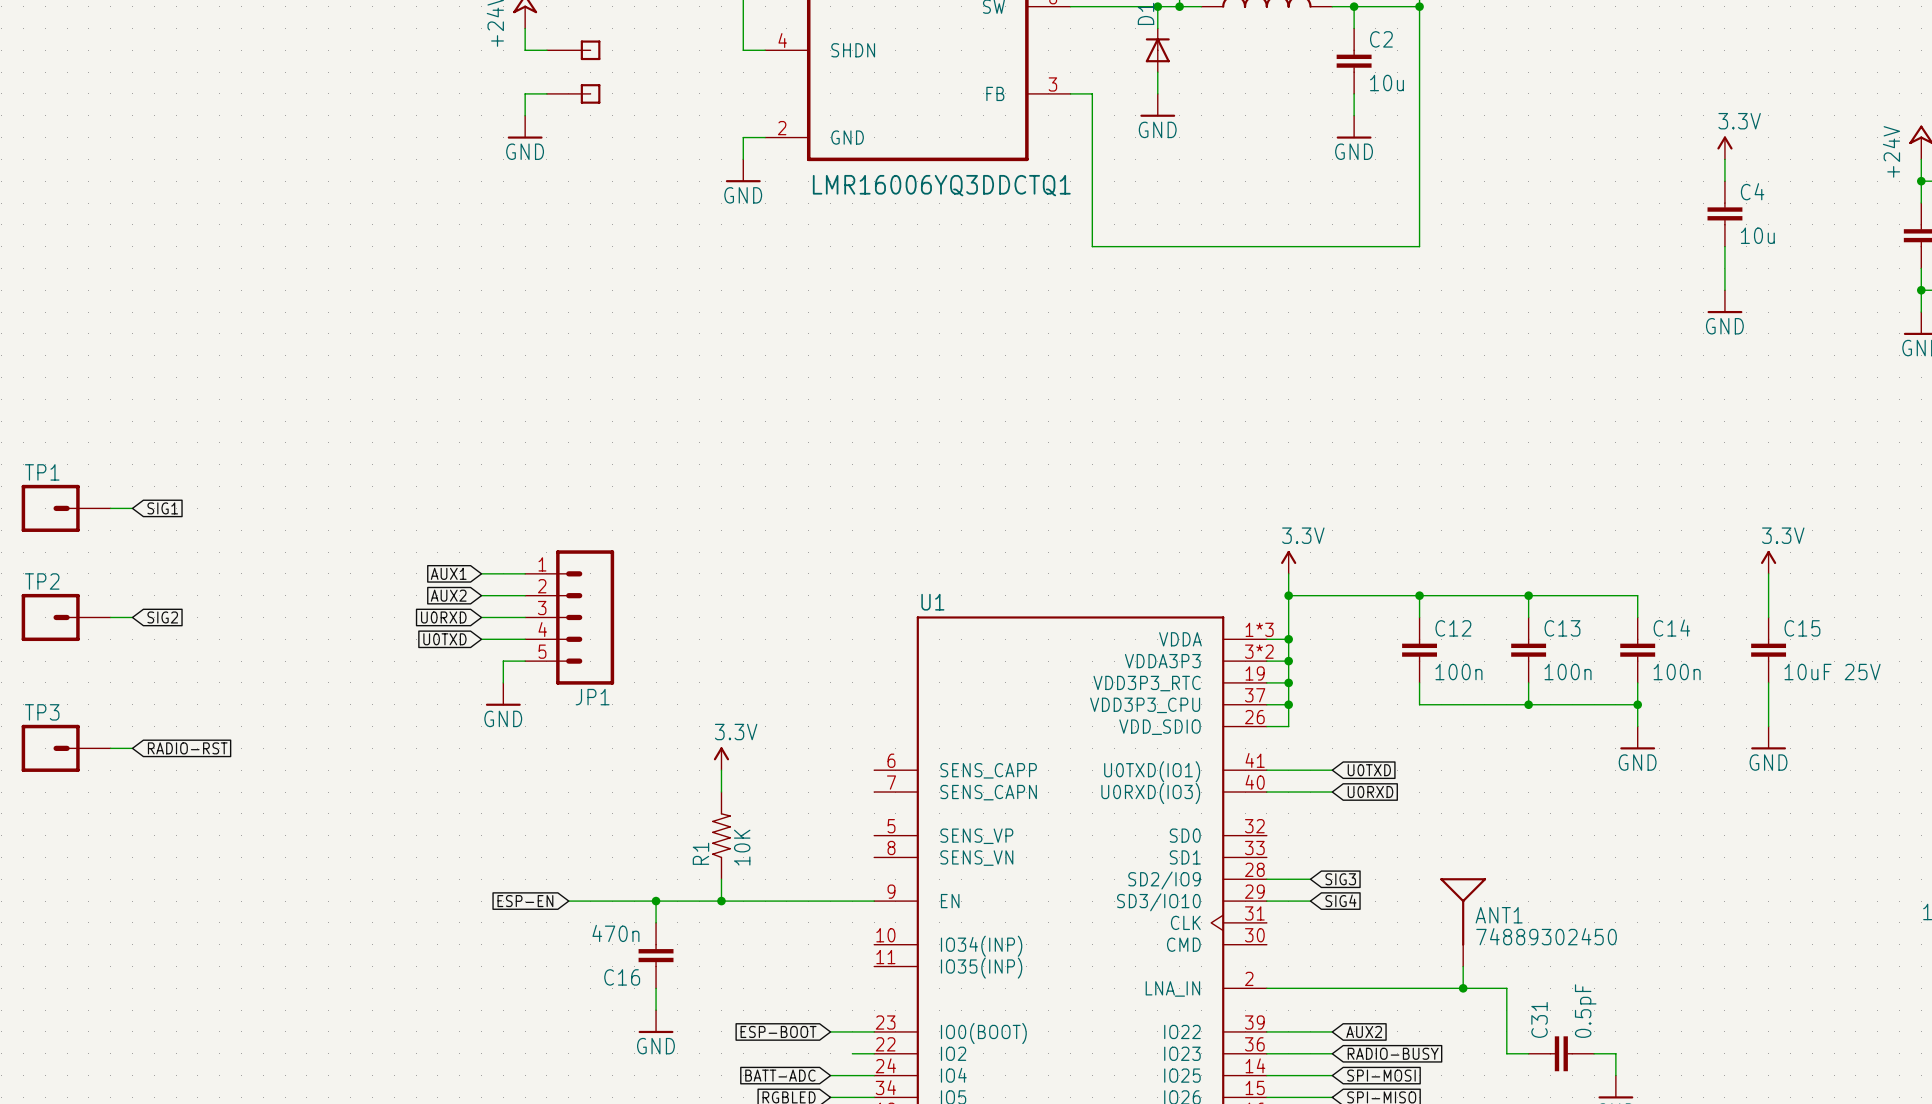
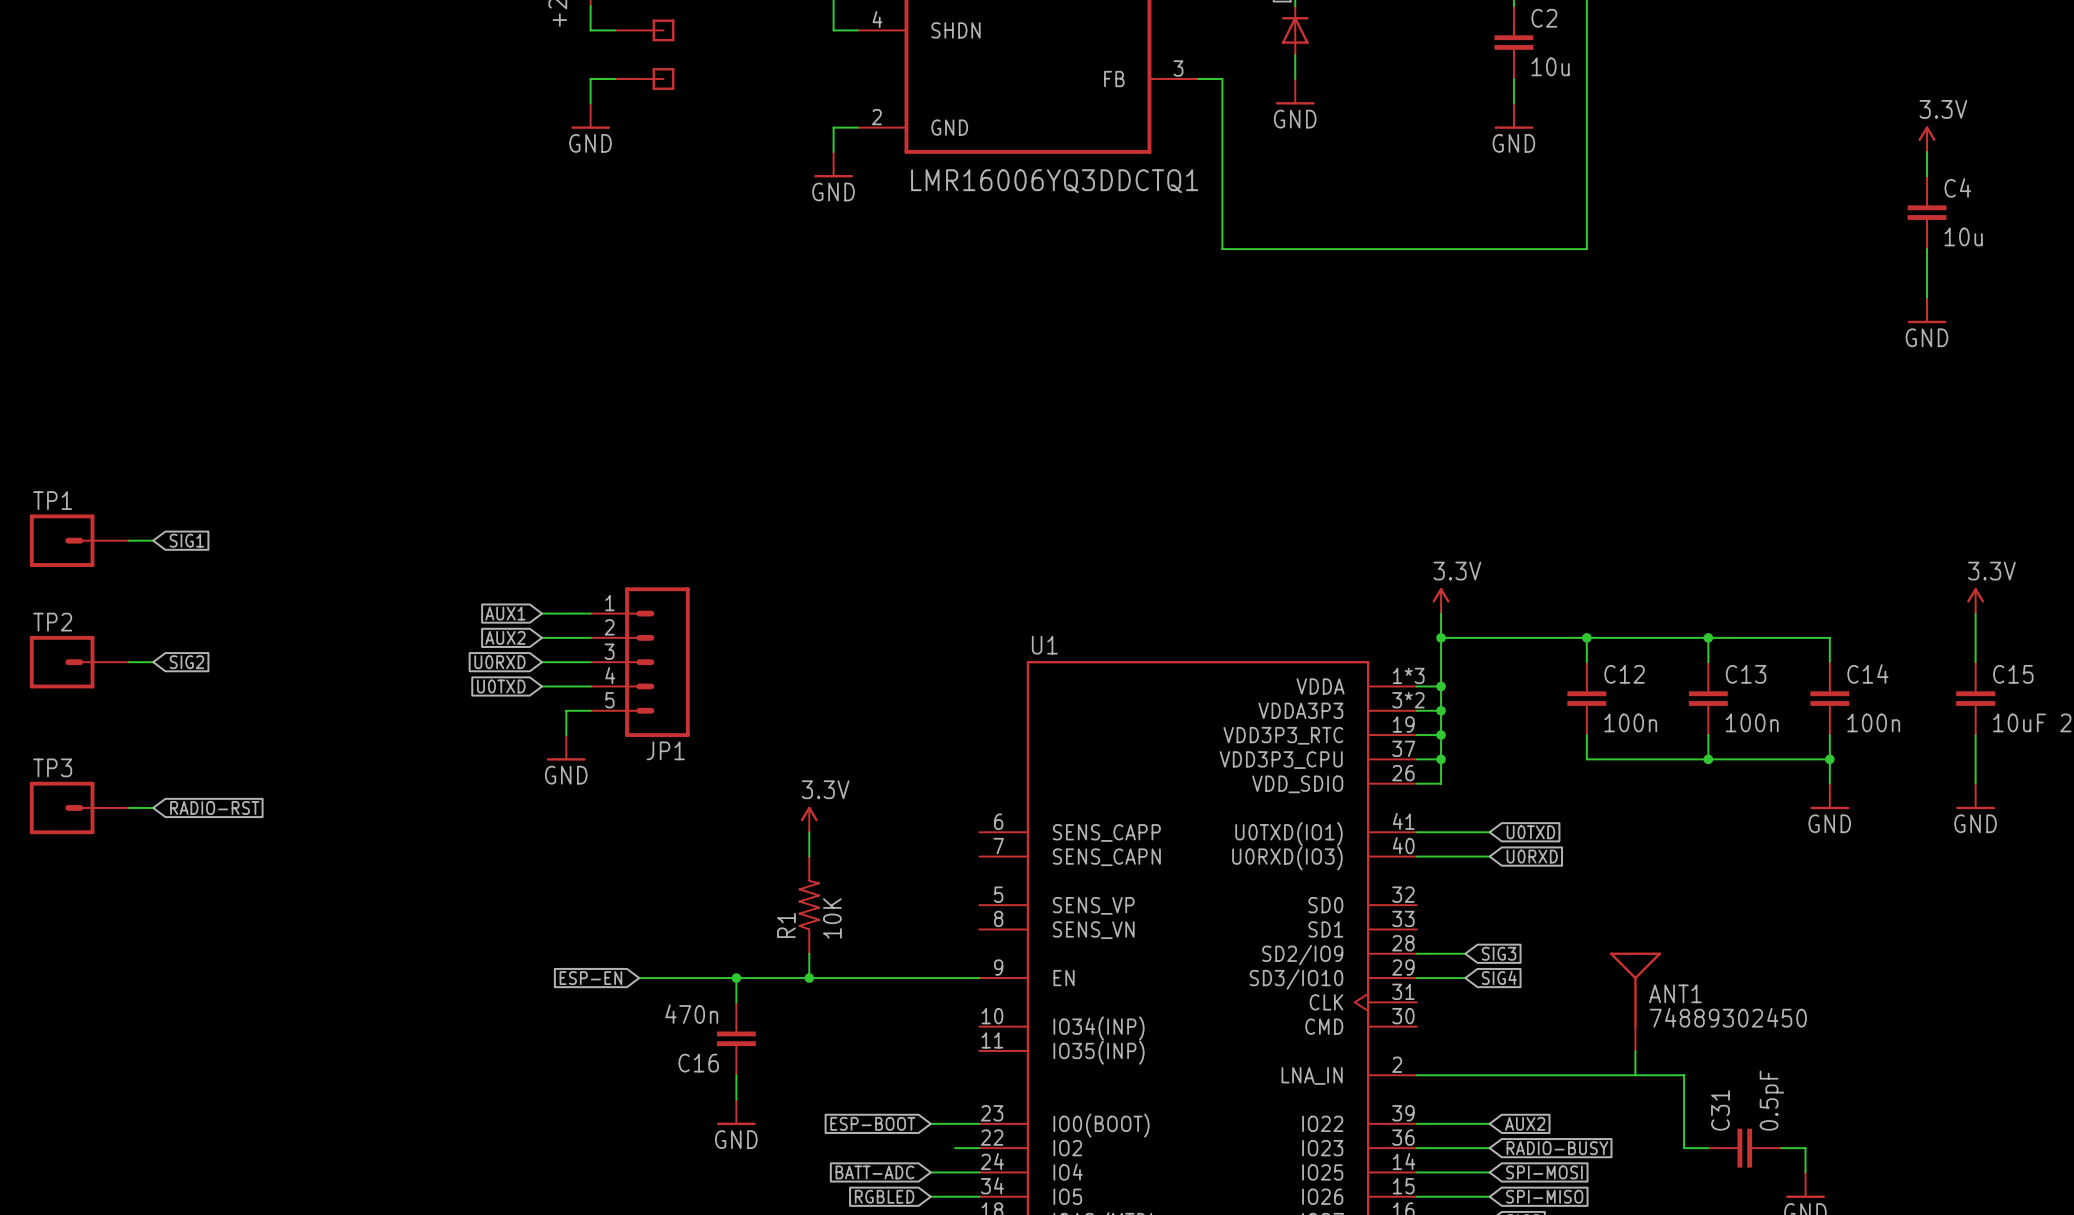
junction: (1463, 988) -> none

